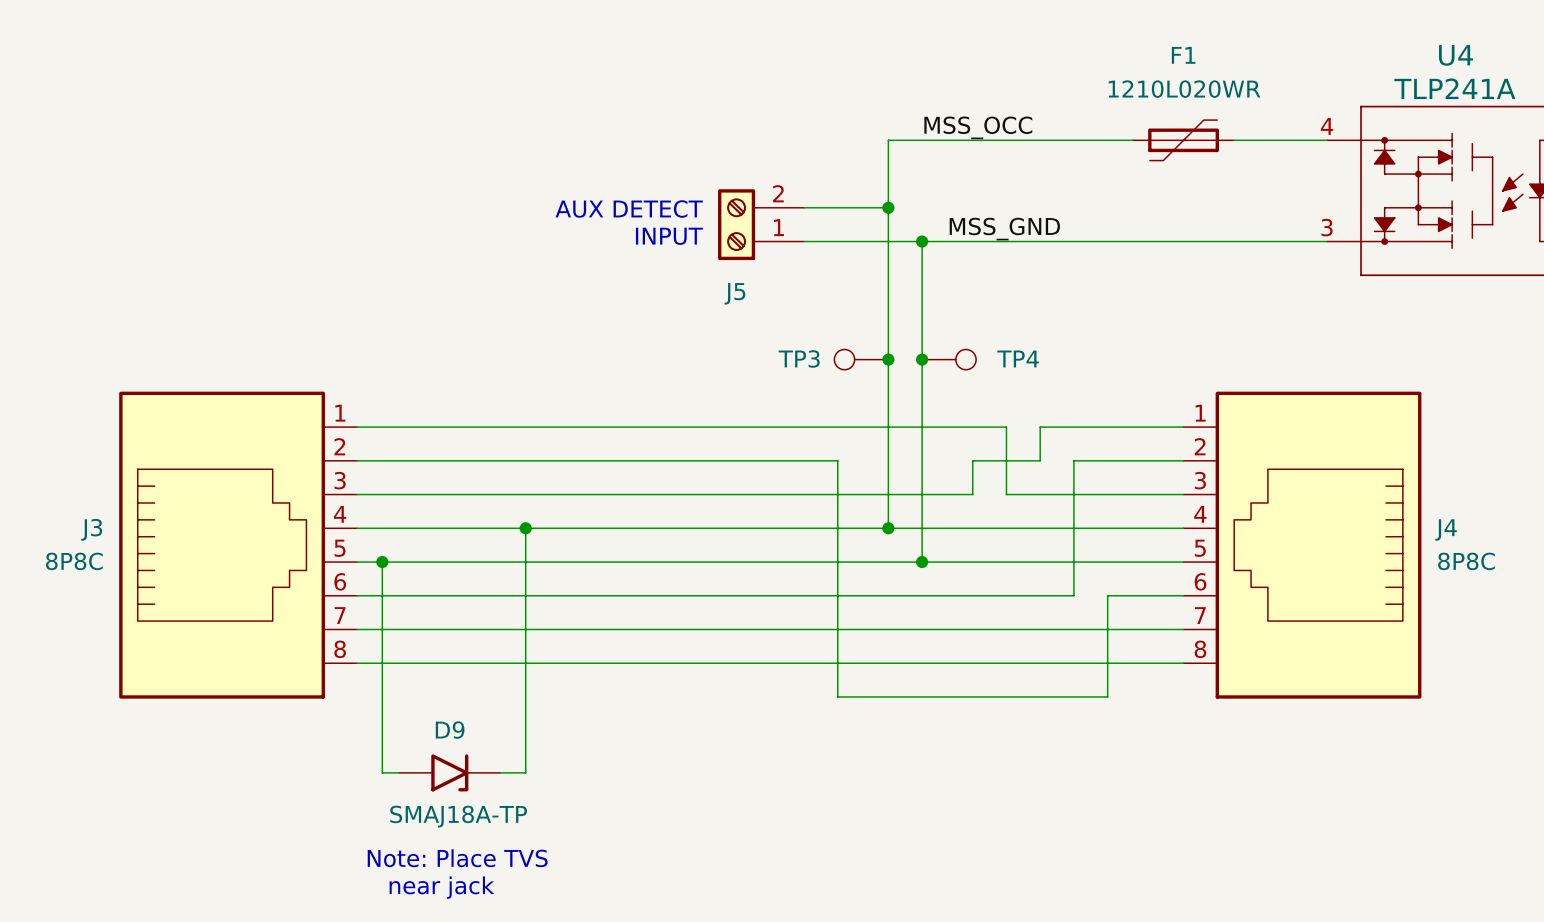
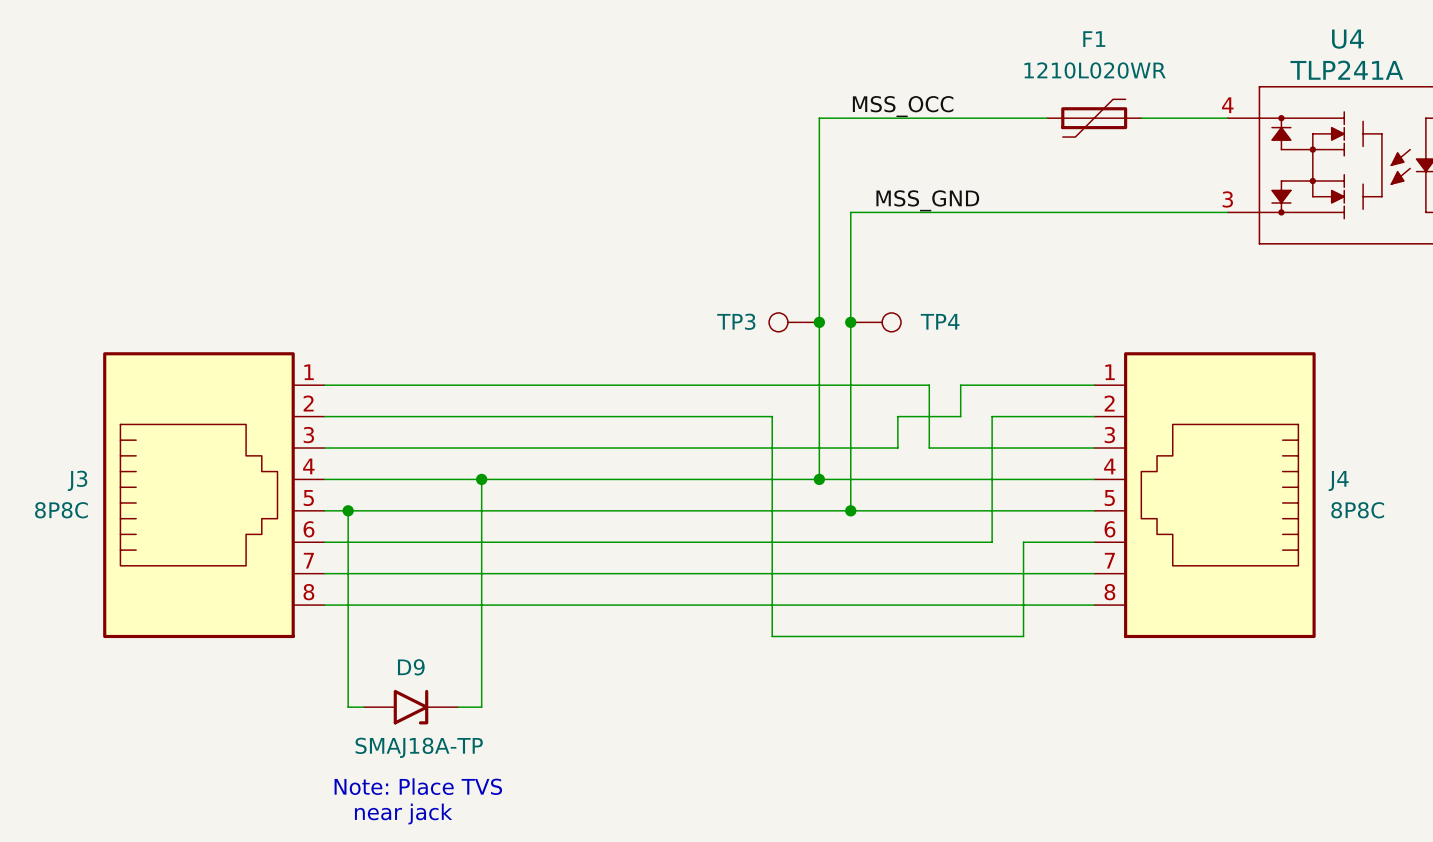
wire: (804, 207) (888, 207) -> none
junction: (888, 207) -> none
text: AUX DETECT (629, 209) -> none
J5: (761, 224) -> none
text: INPUT (669, 236) -> none
wire: (804, 241) (922, 241) -> none
junction: (922, 241) -> none

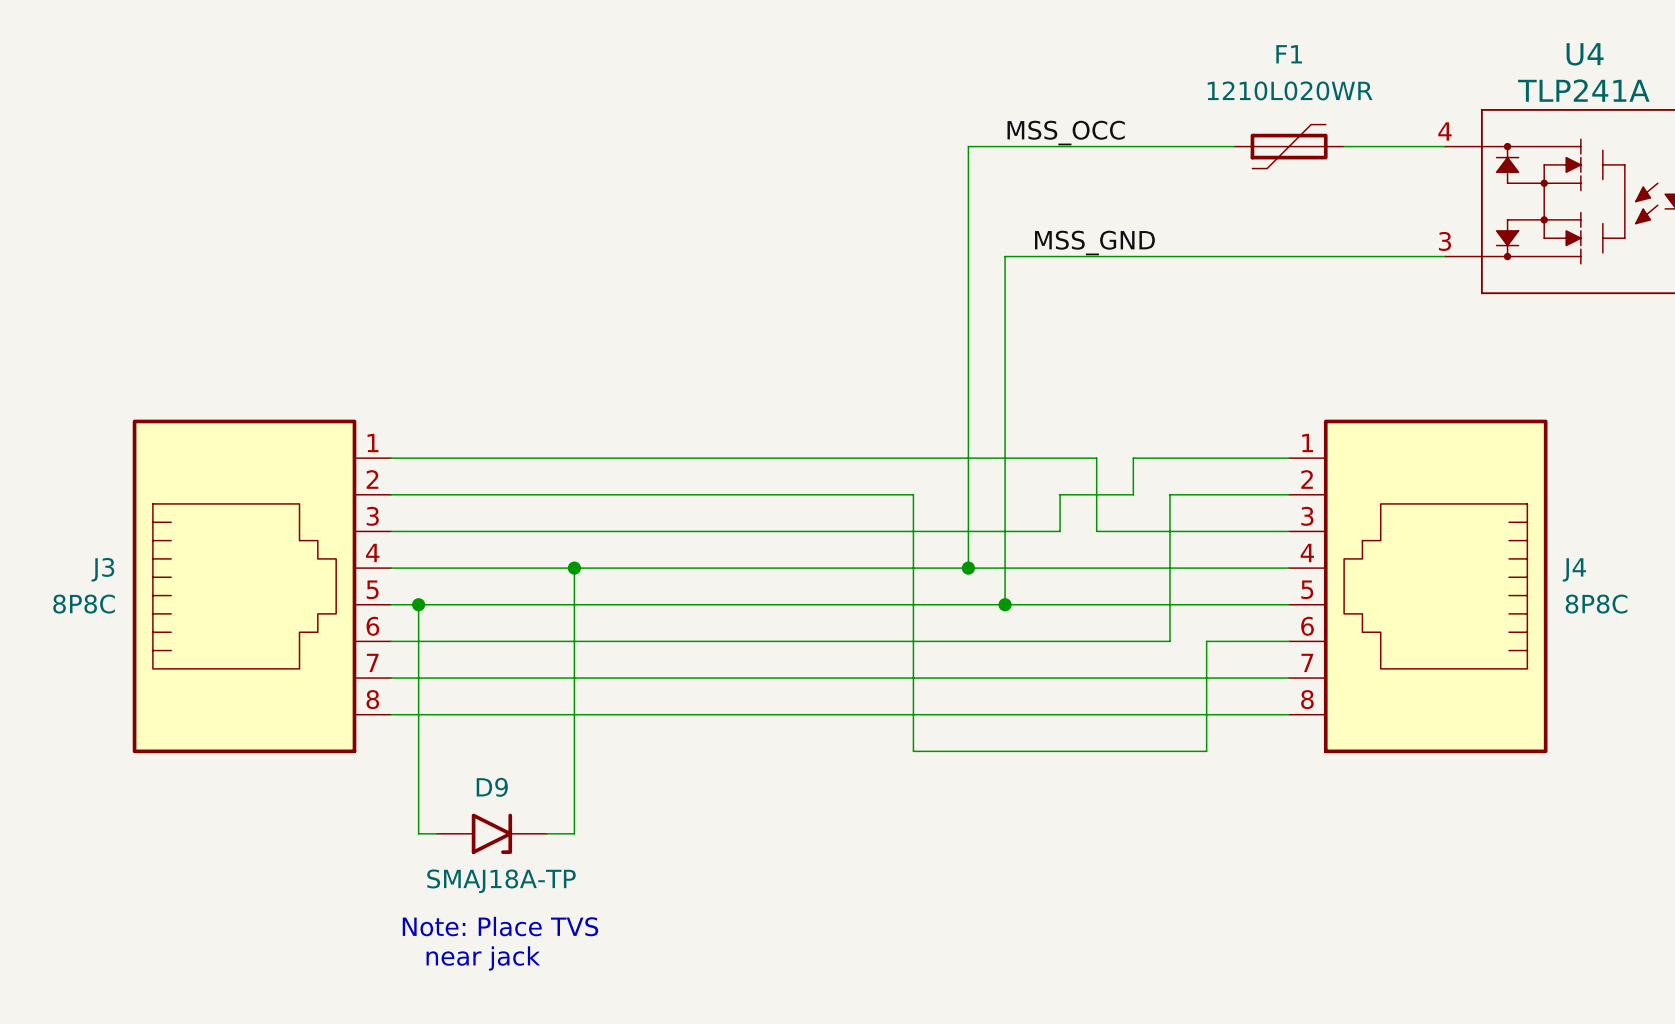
TP3: (794, 322) -> none
junction: (819, 322) -> none
junction: (850, 322) -> none
TP4: (875, 322) -> none

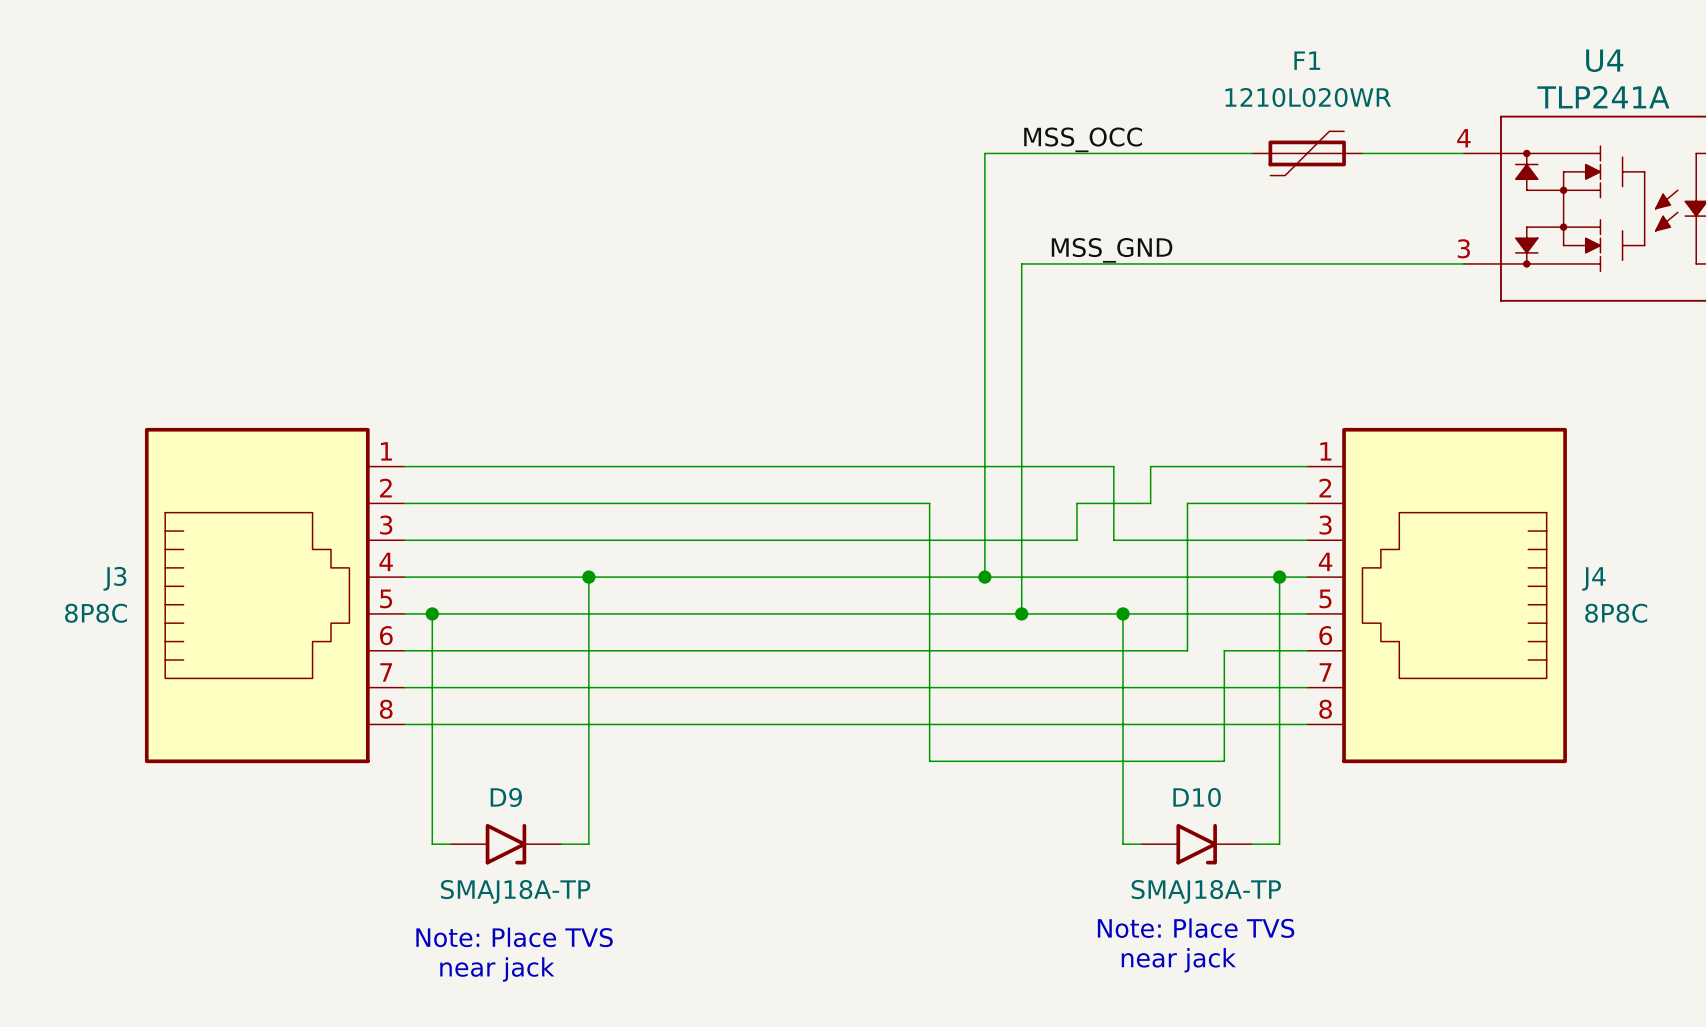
wire: none -> (1279, 577) (1279, 844) (1251, 844)
junction: none -> (1279, 577)
wire: none -> (1123, 613) (1123, 844) (1141, 844)
junction: none -> (1123, 613)
D10: none -> SMAJ18A-TP (1196, 844)
text: none -> Note: Place TVS (1196, 928)
text: none -> near jack (1178, 960)

